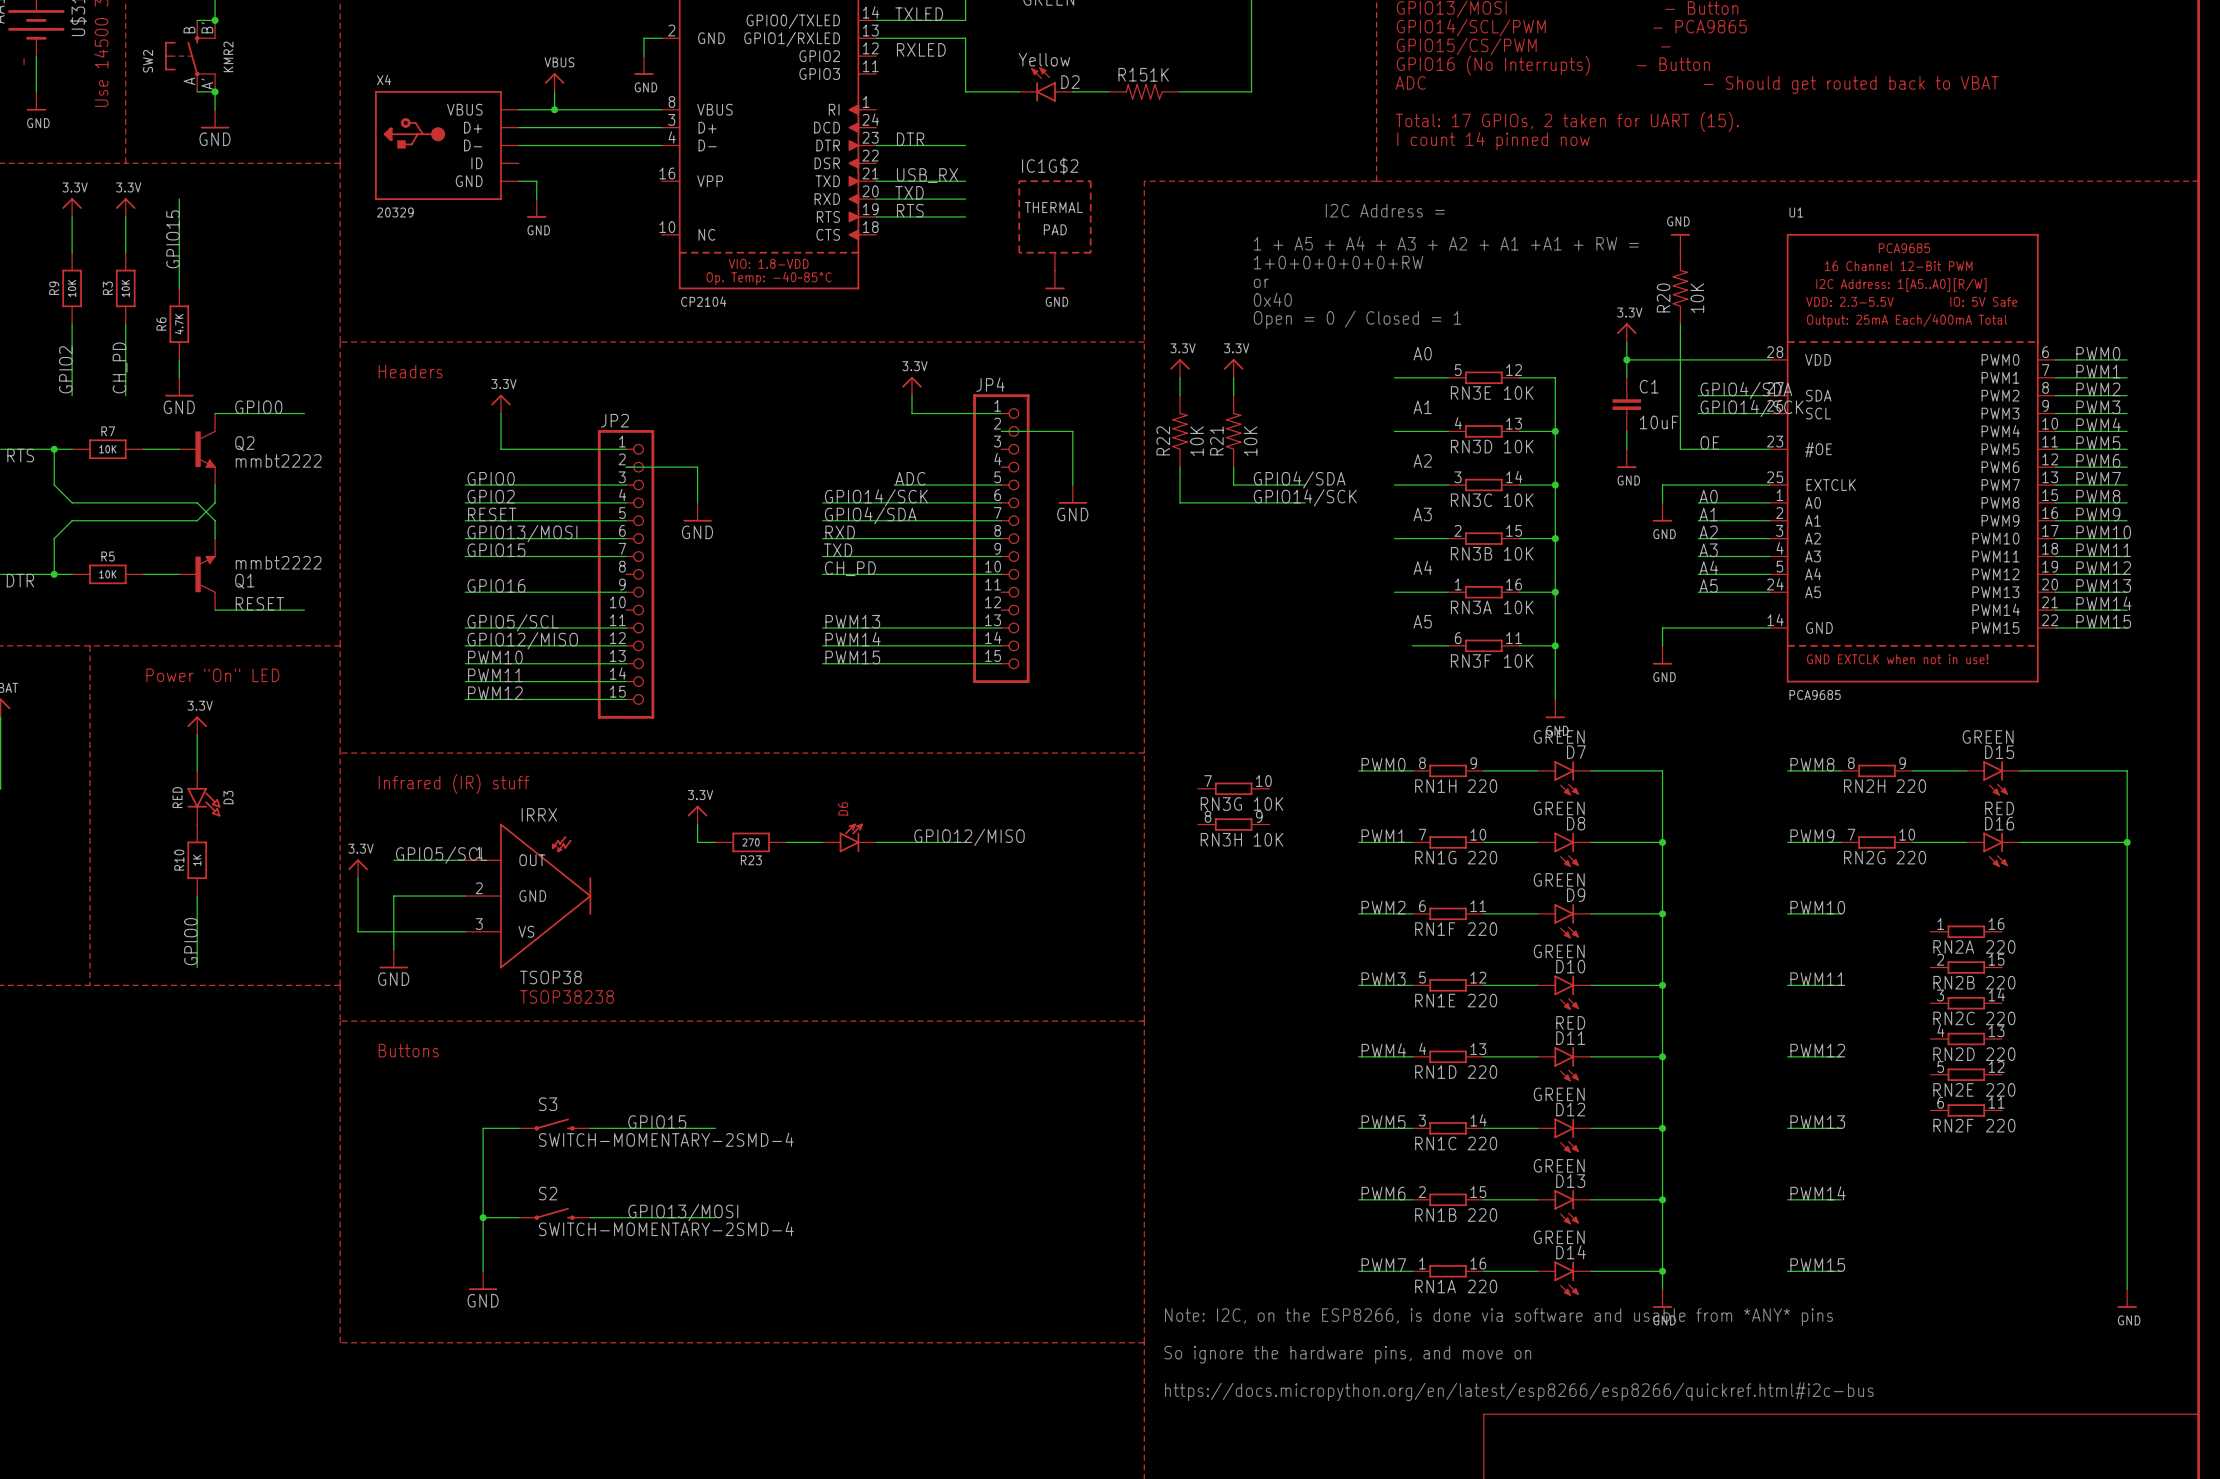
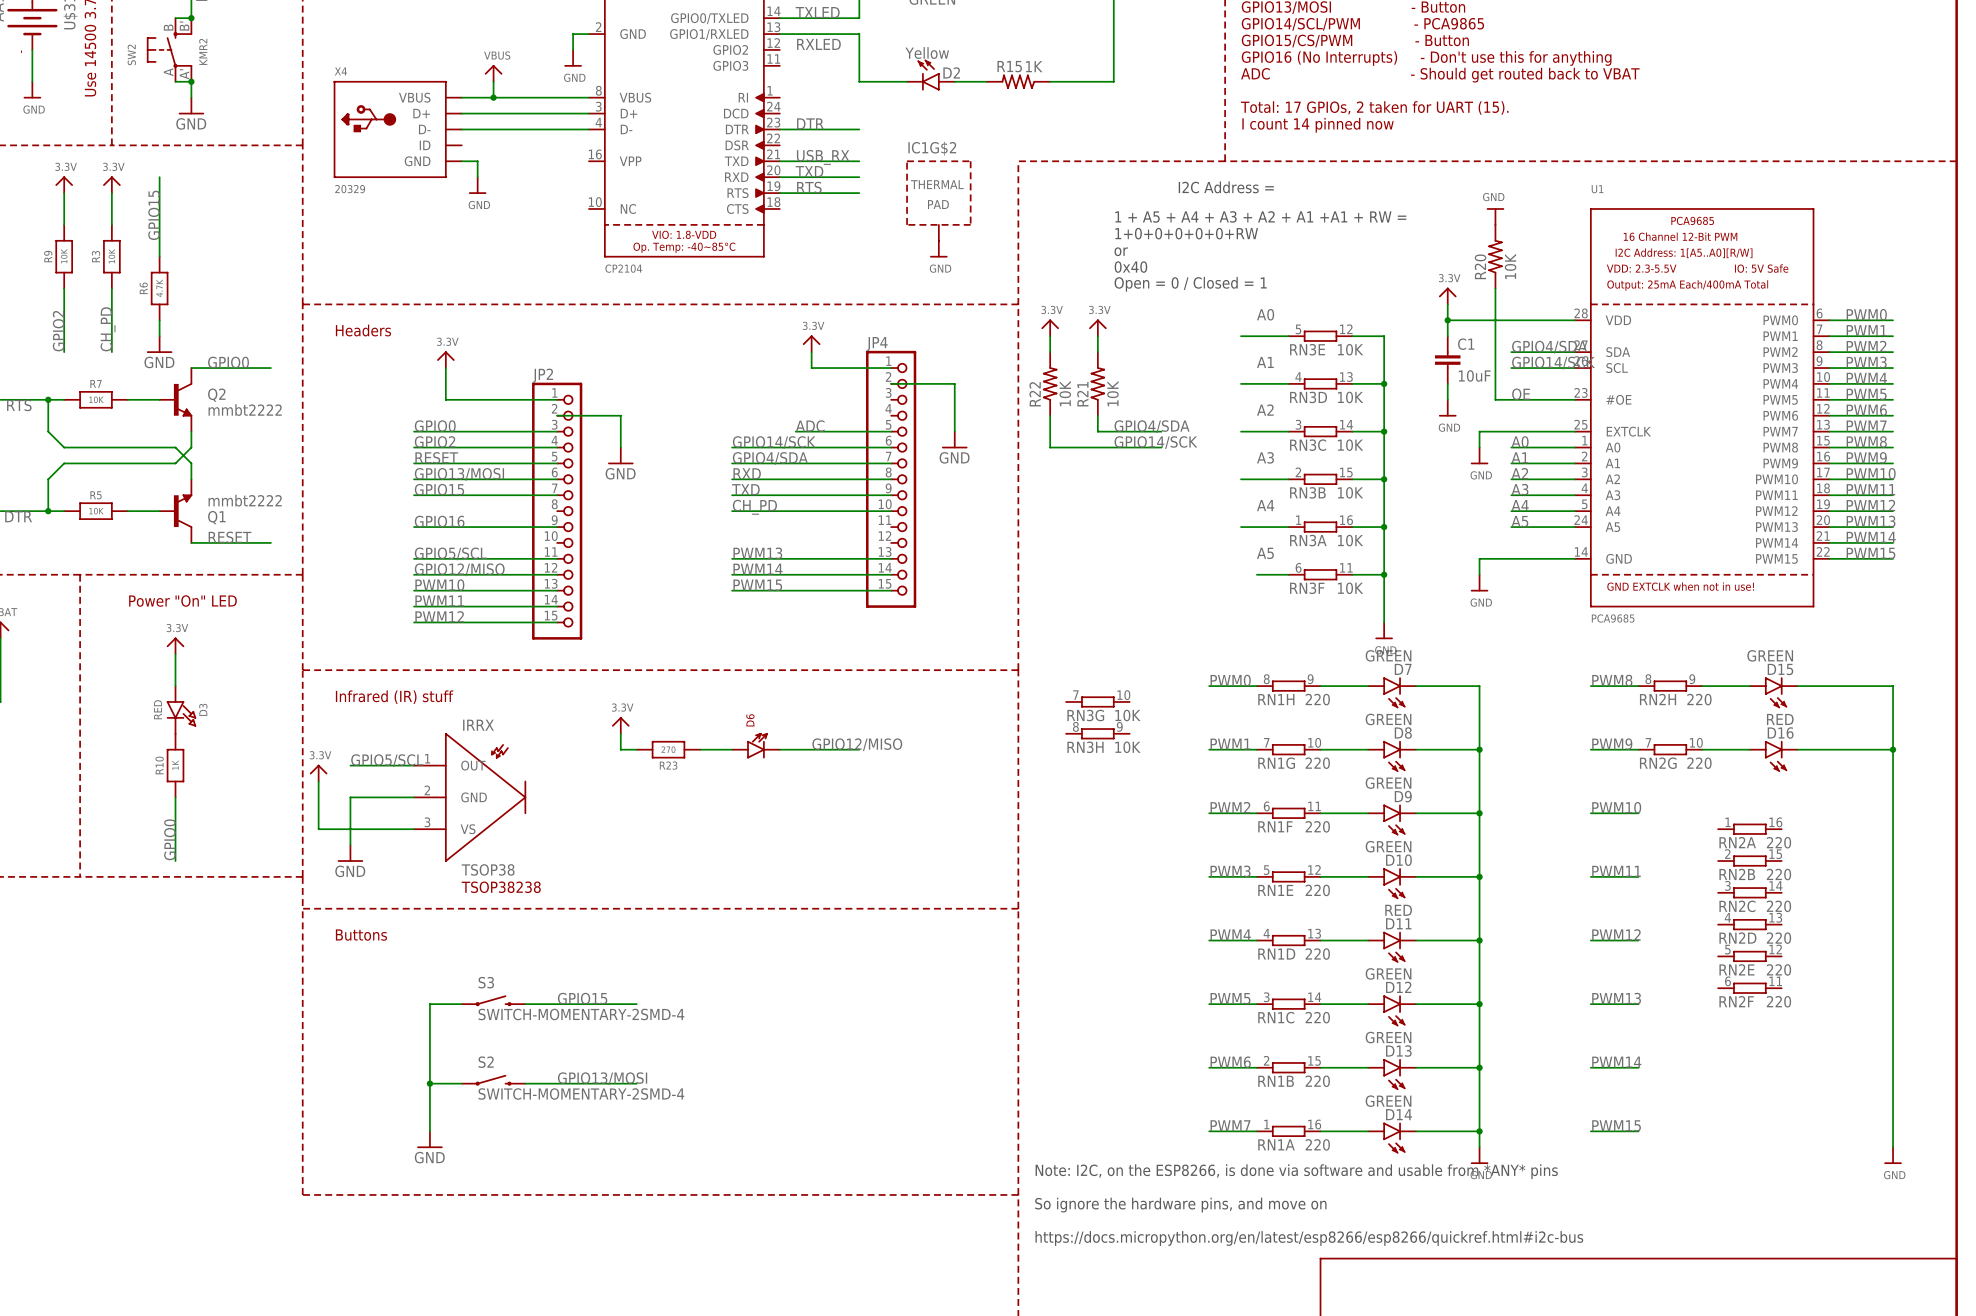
text: GPIO15/CS/PWM - (1533, 46) -> GPIO15/CS/PWM - Button (1355, 41)
text: GPIO16 (No Interrupts) - Button (1553, 65) -> GPIO16 (No Interrupts) - Don't use this for anything (1426, 58)

